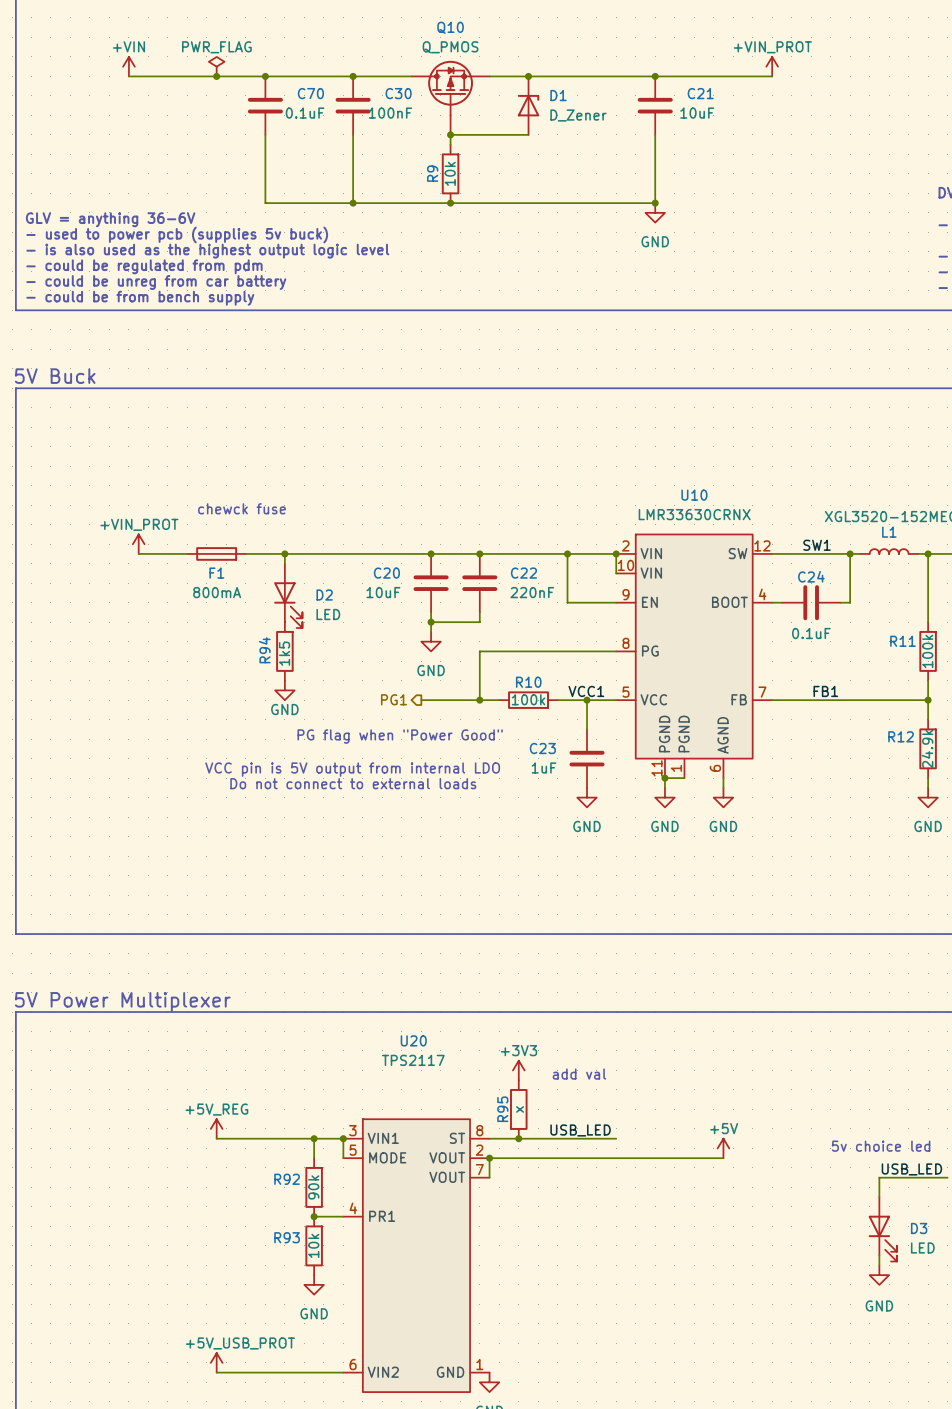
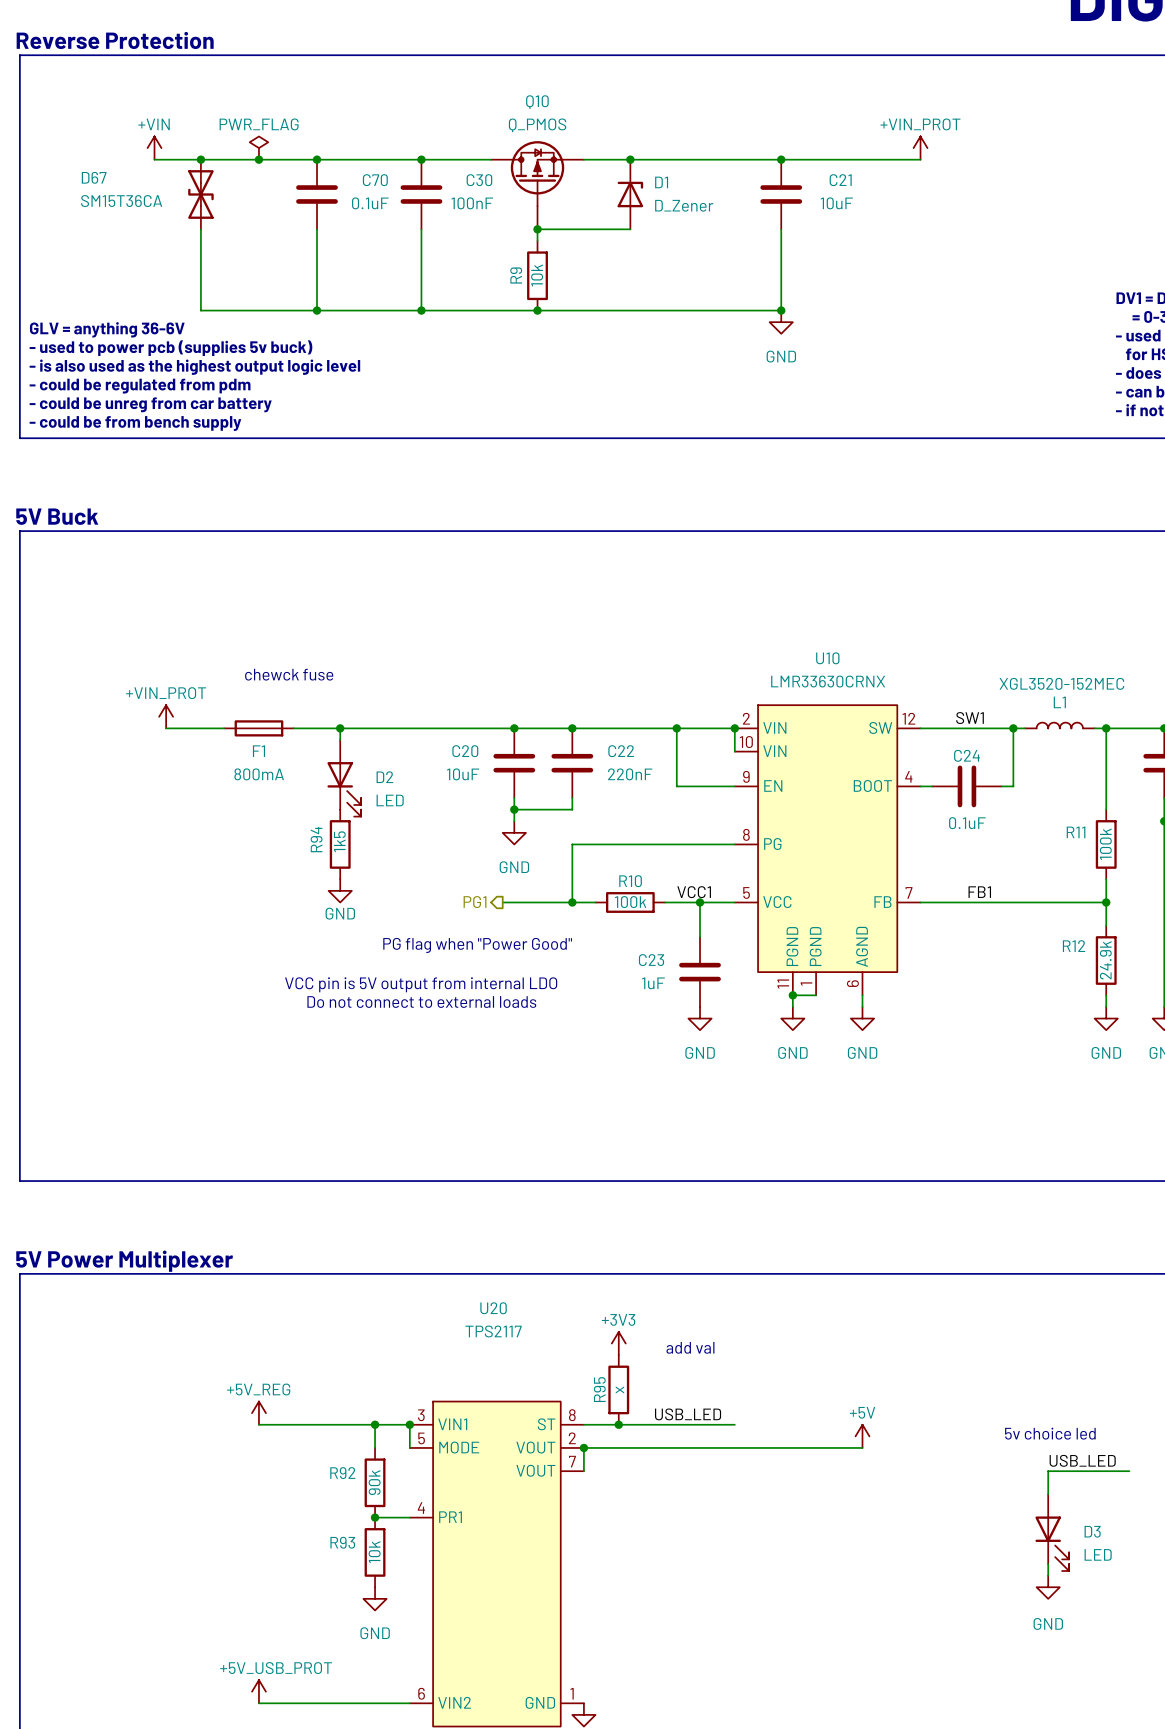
junction: none -> (200, 159)
D67: none -> SM15T36CA (200, 194)
wire: none -> (200, 229) (200, 310) (317, 310)
junction: none -> (317, 310)

